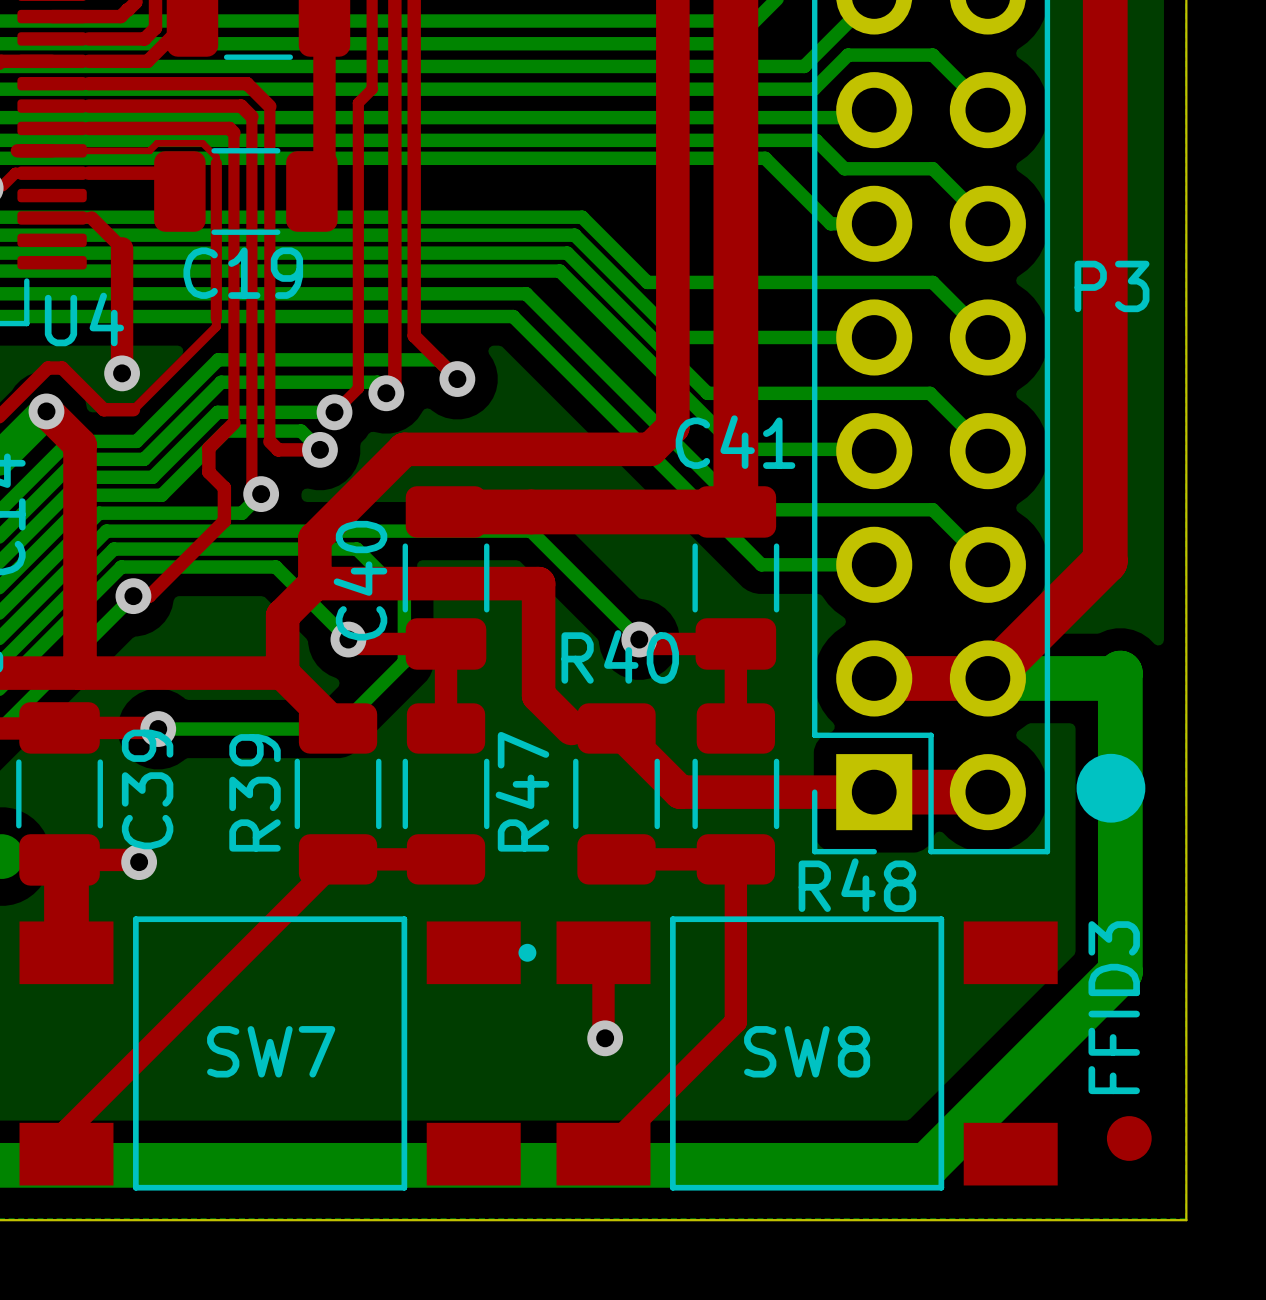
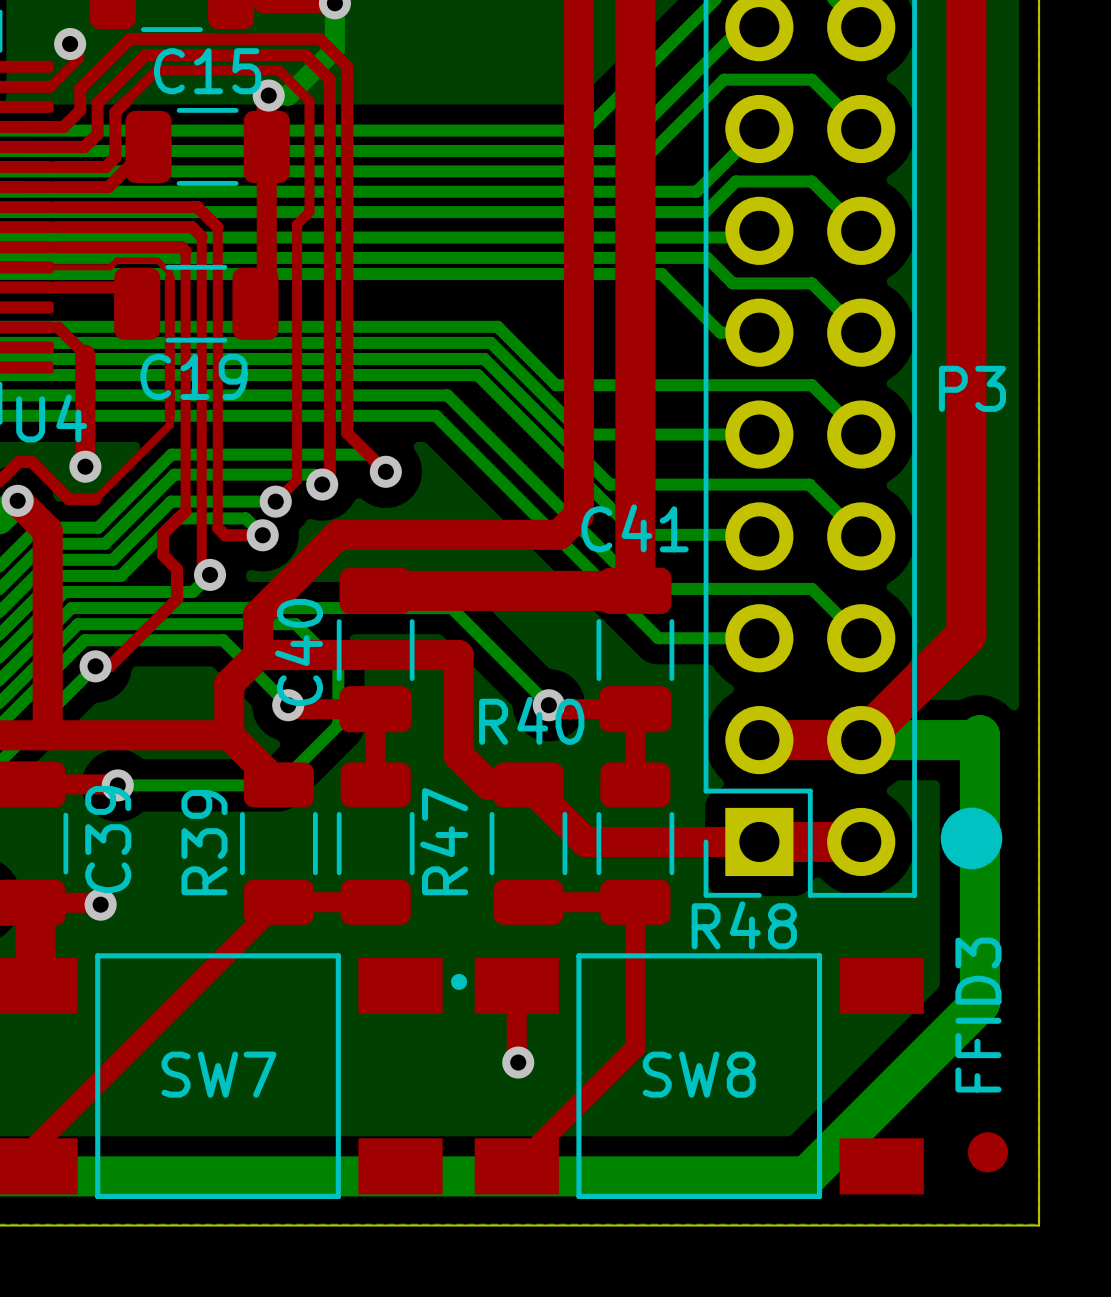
SW8 footprint: [518, 916, 1058, 1191] -> [451, 953, 924, 1199]
FFID3 name position: FFID3 (1114, 1007) -> FFID3 (978, 1015)

